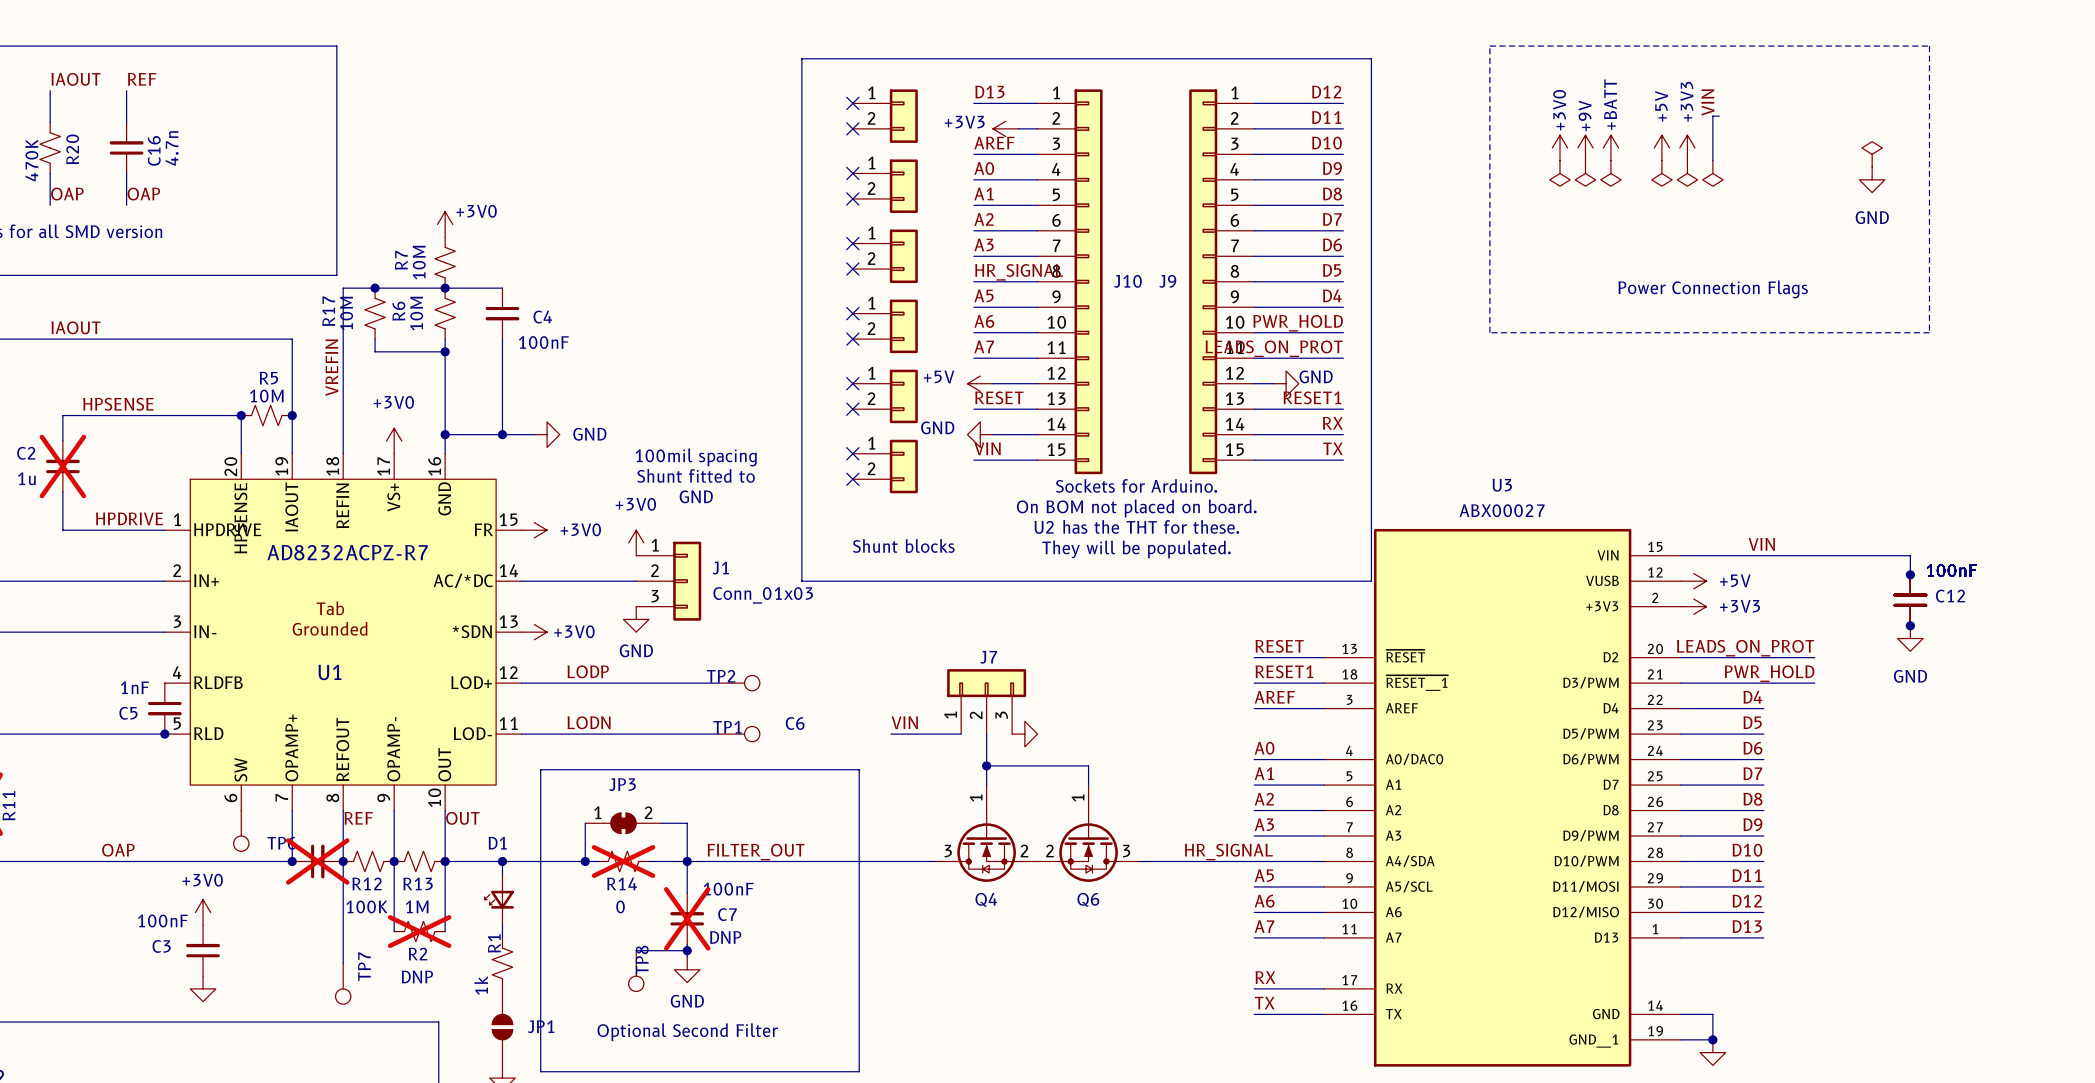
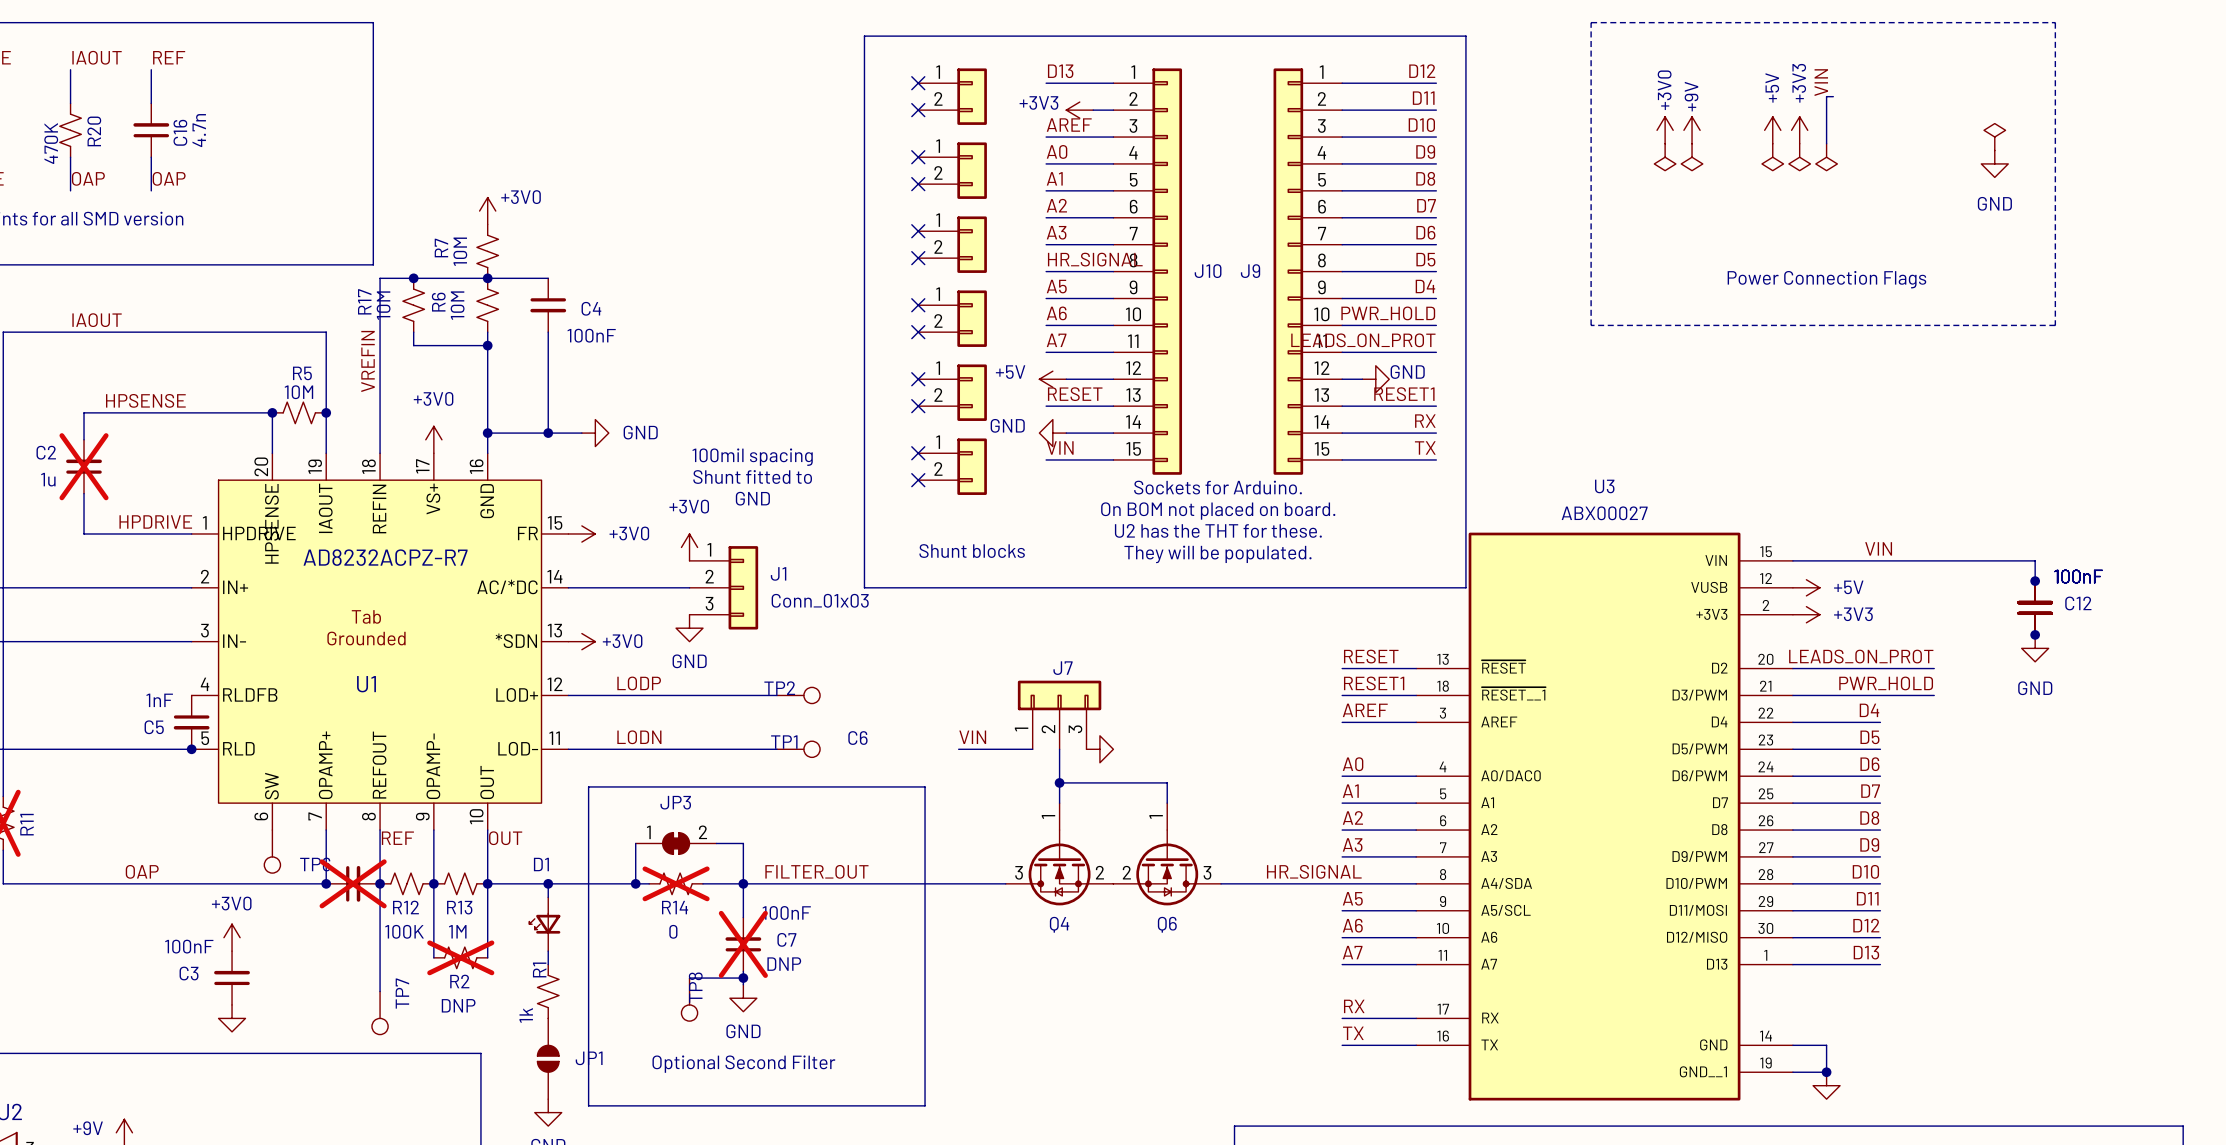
power symbol: +BATT (1610, 147) -> none
power symbol: (1610, 173) -> none

